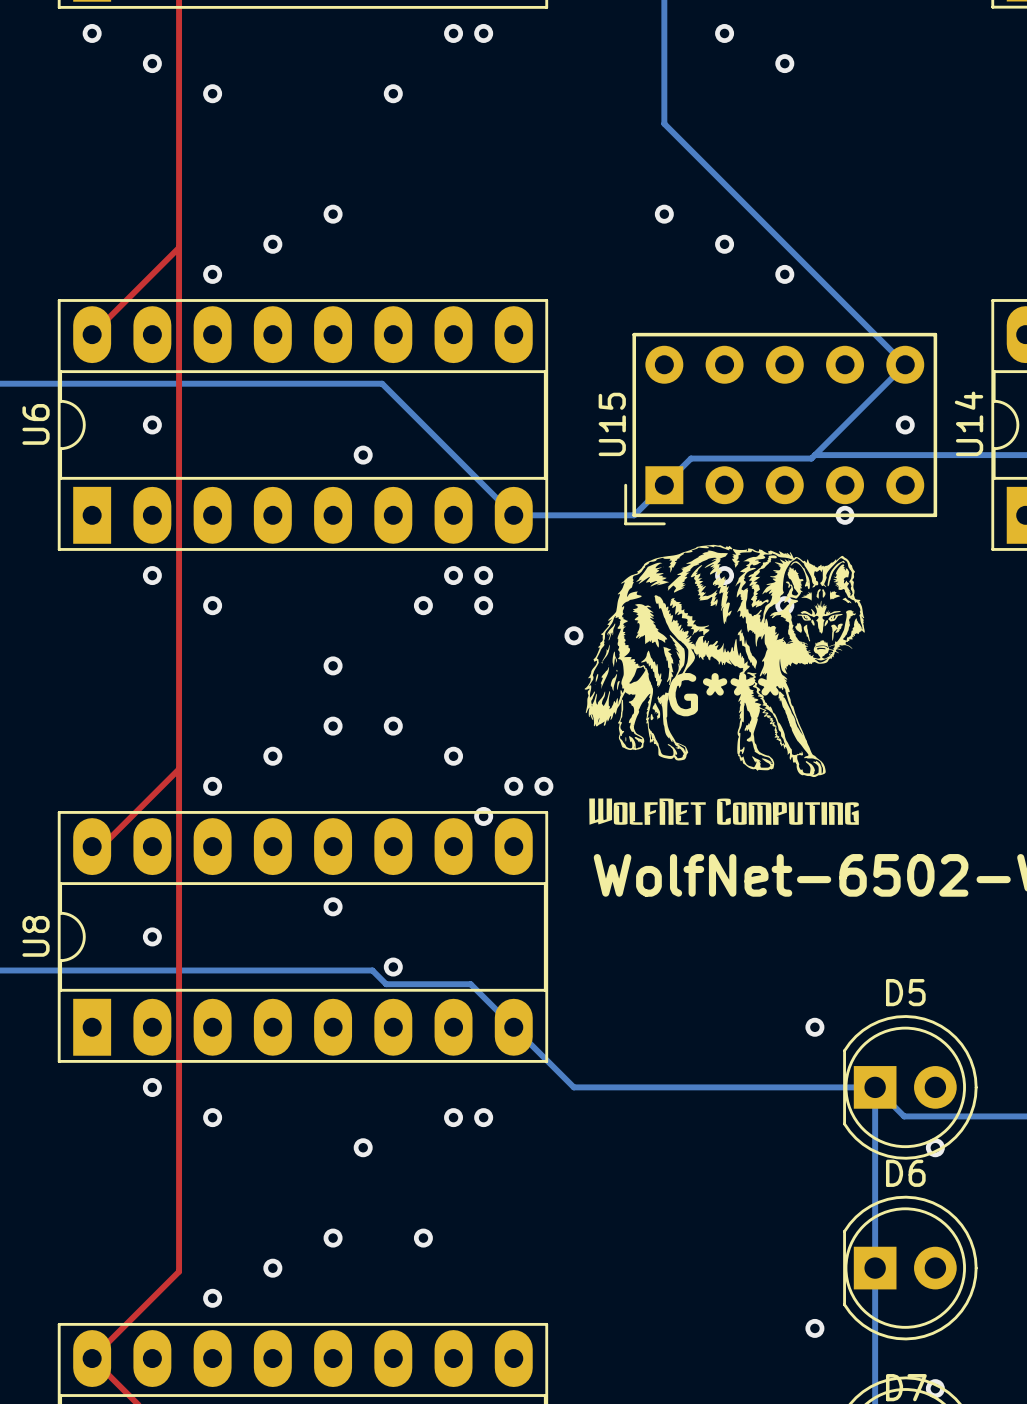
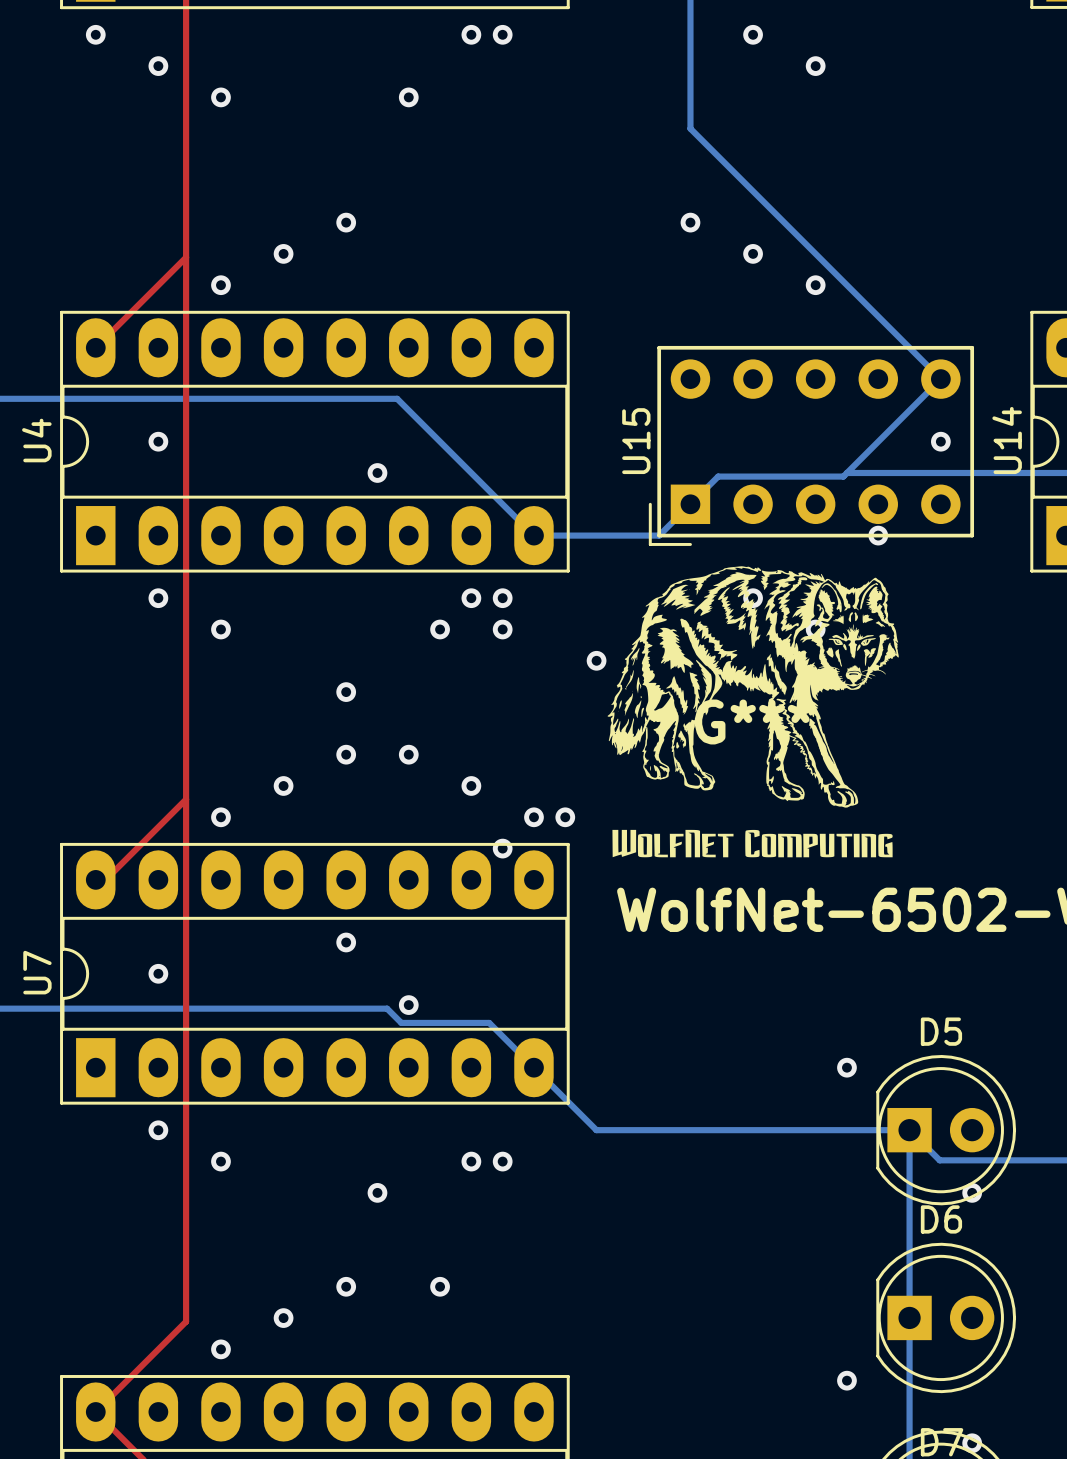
U6 name: U6 (36, 424) -> U4 (36, 440)
U8 name: U8 (36, 936) -> U7 (37, 972)

